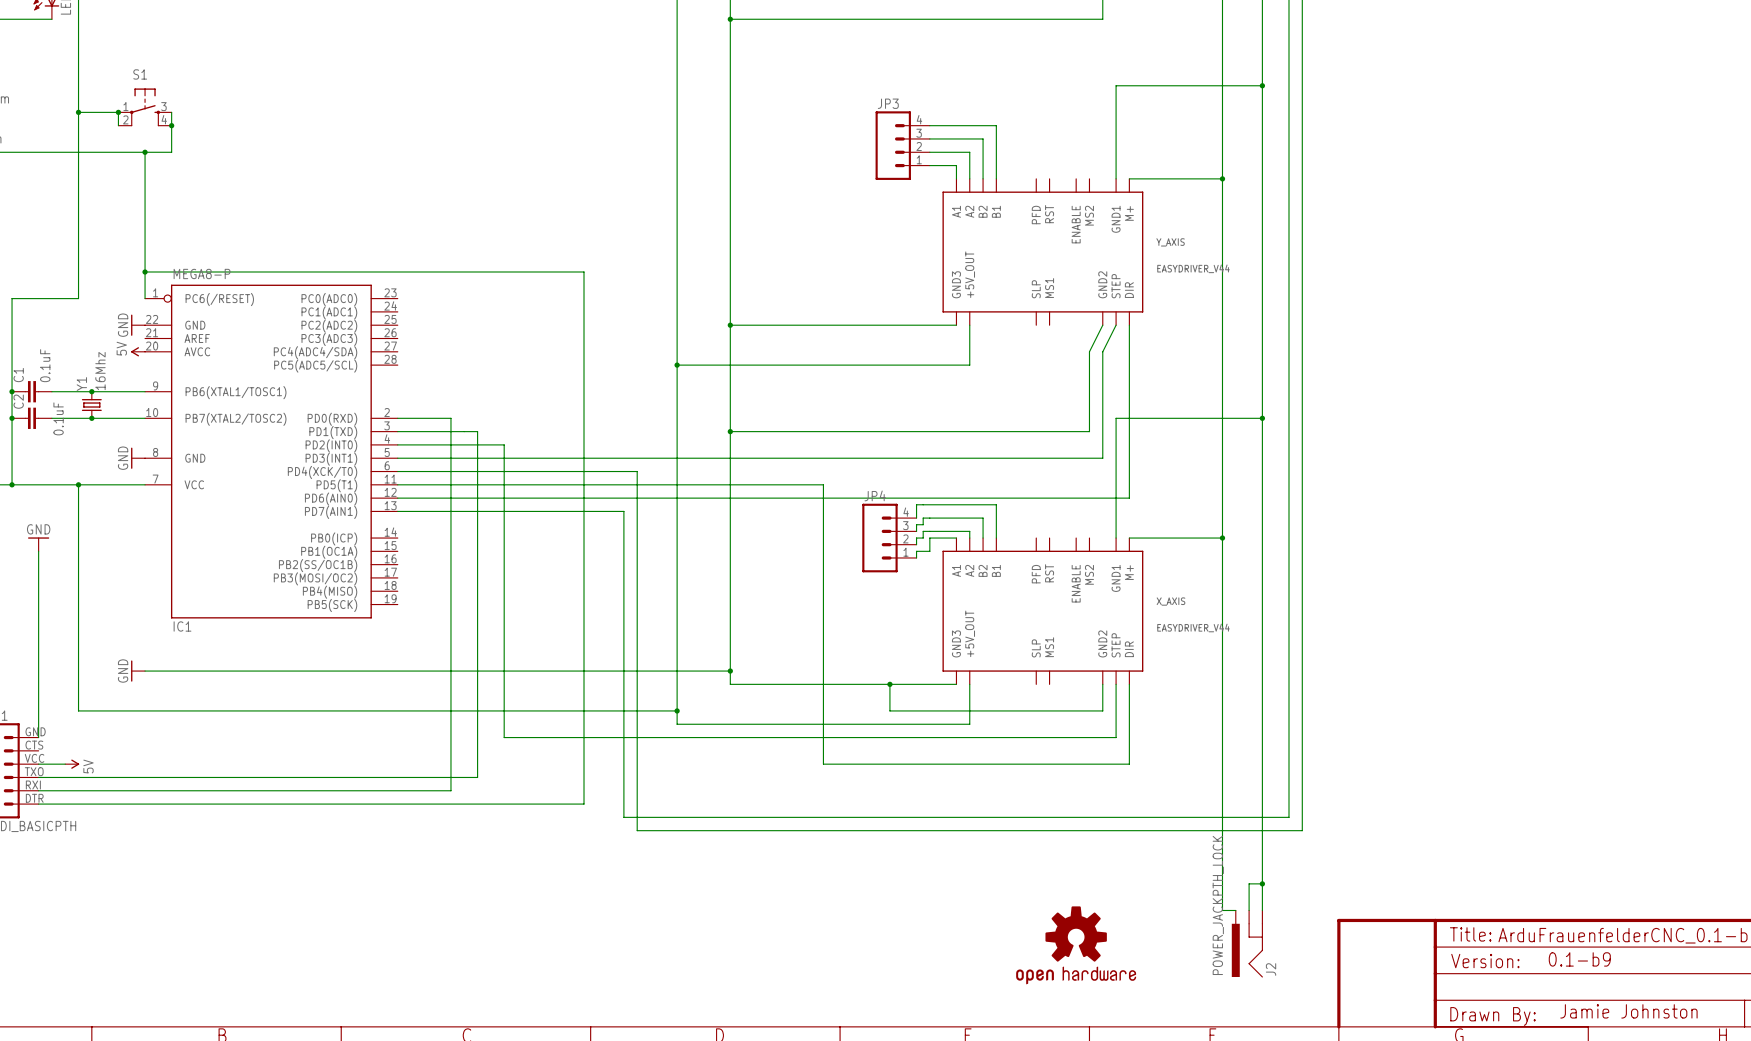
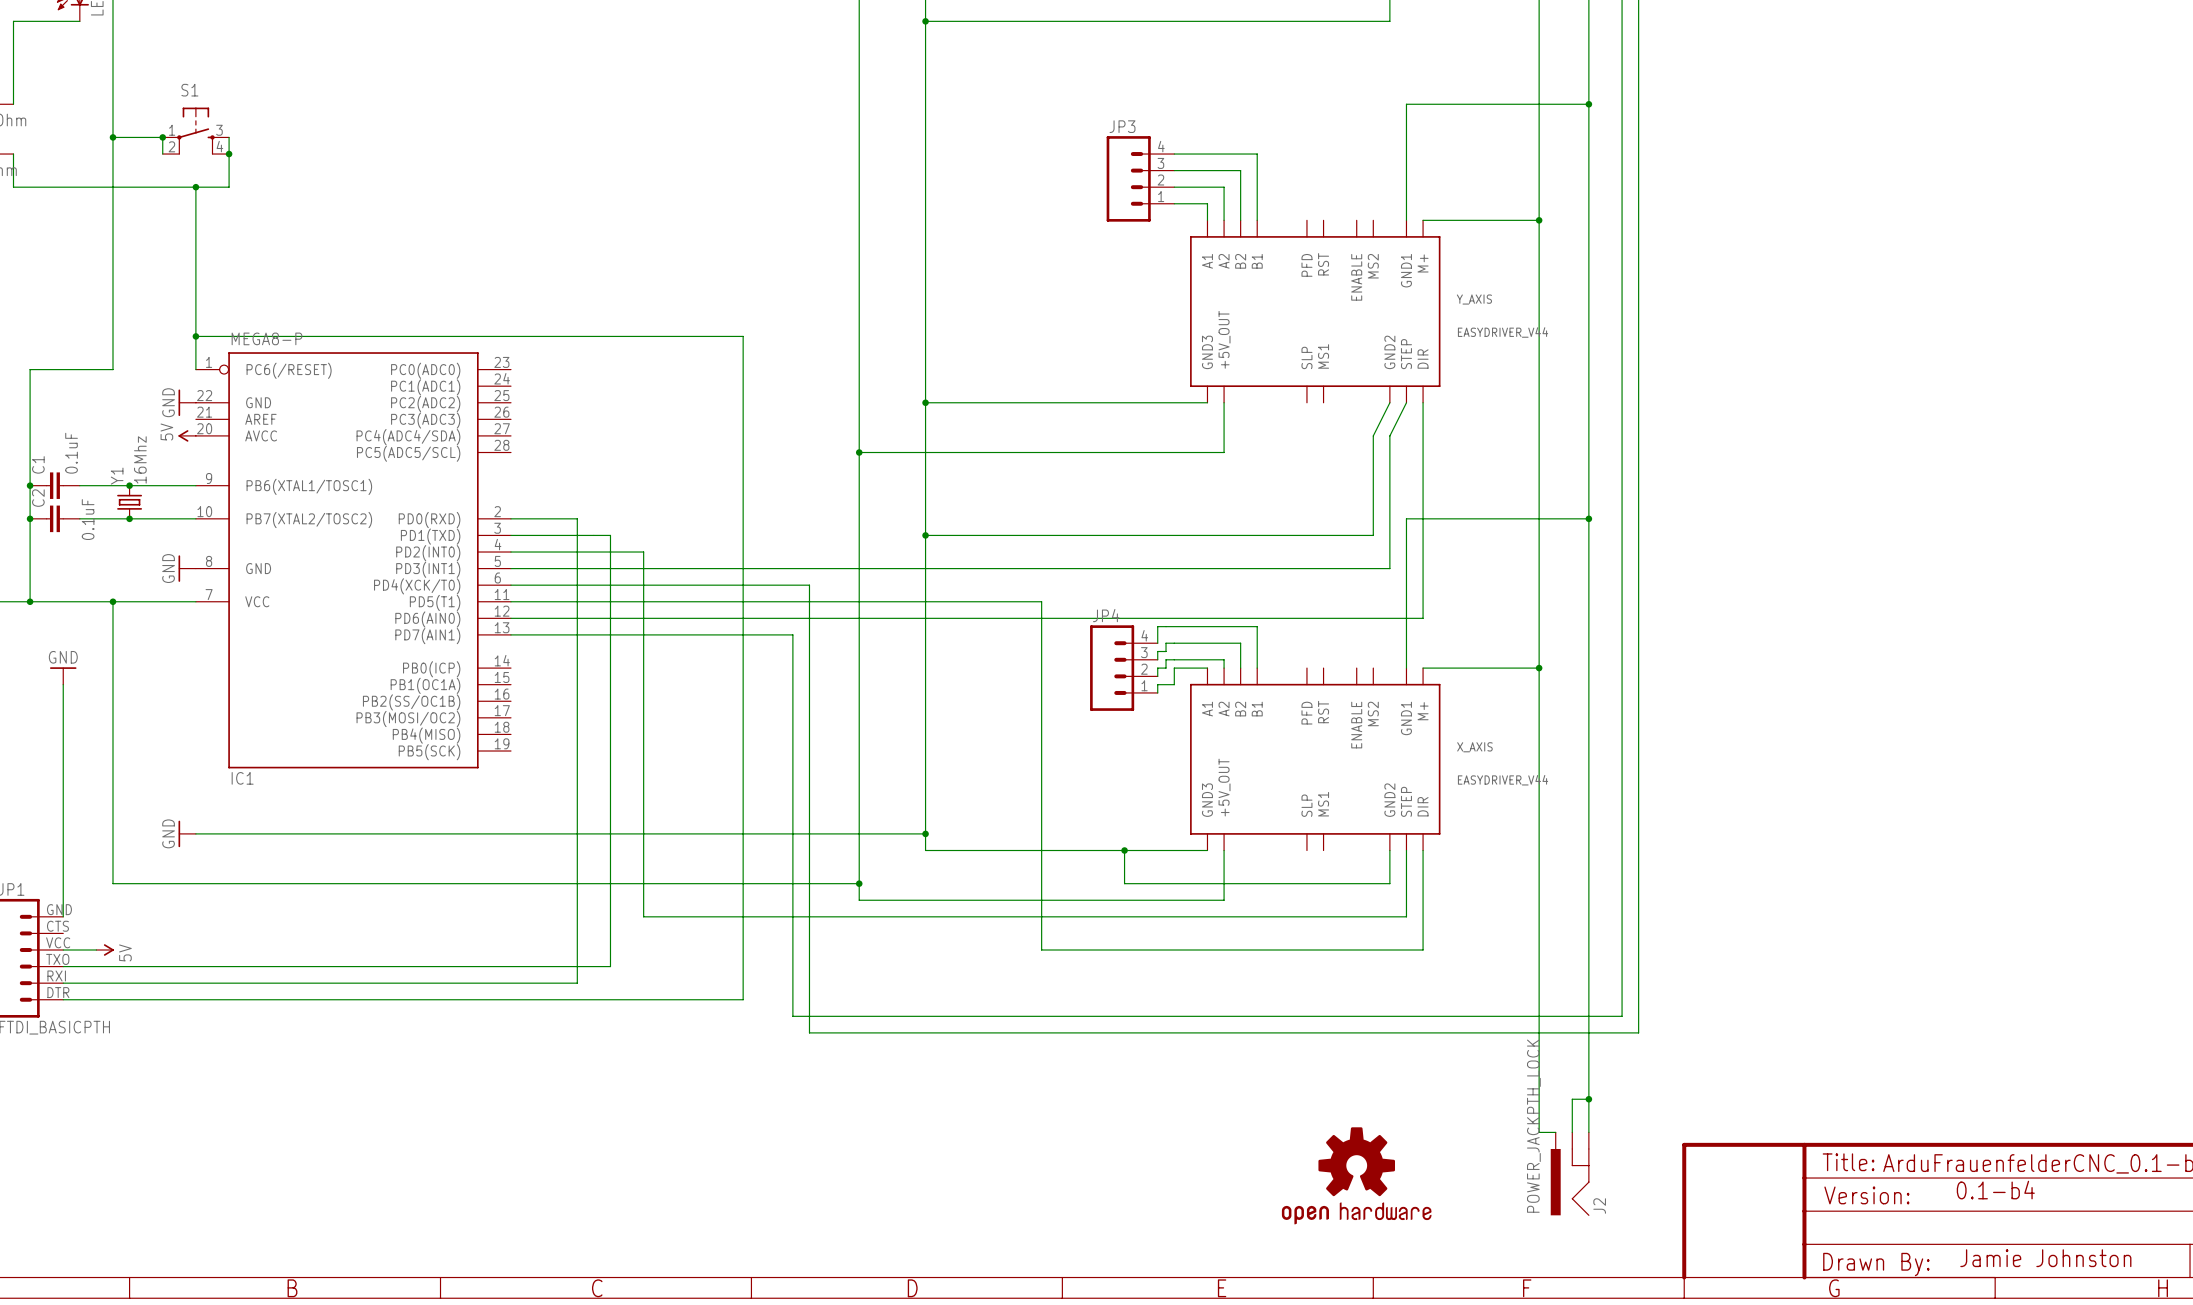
text: 0.1-b9 (1579, 959) -> 0.1-b4 (1995, 1190)

